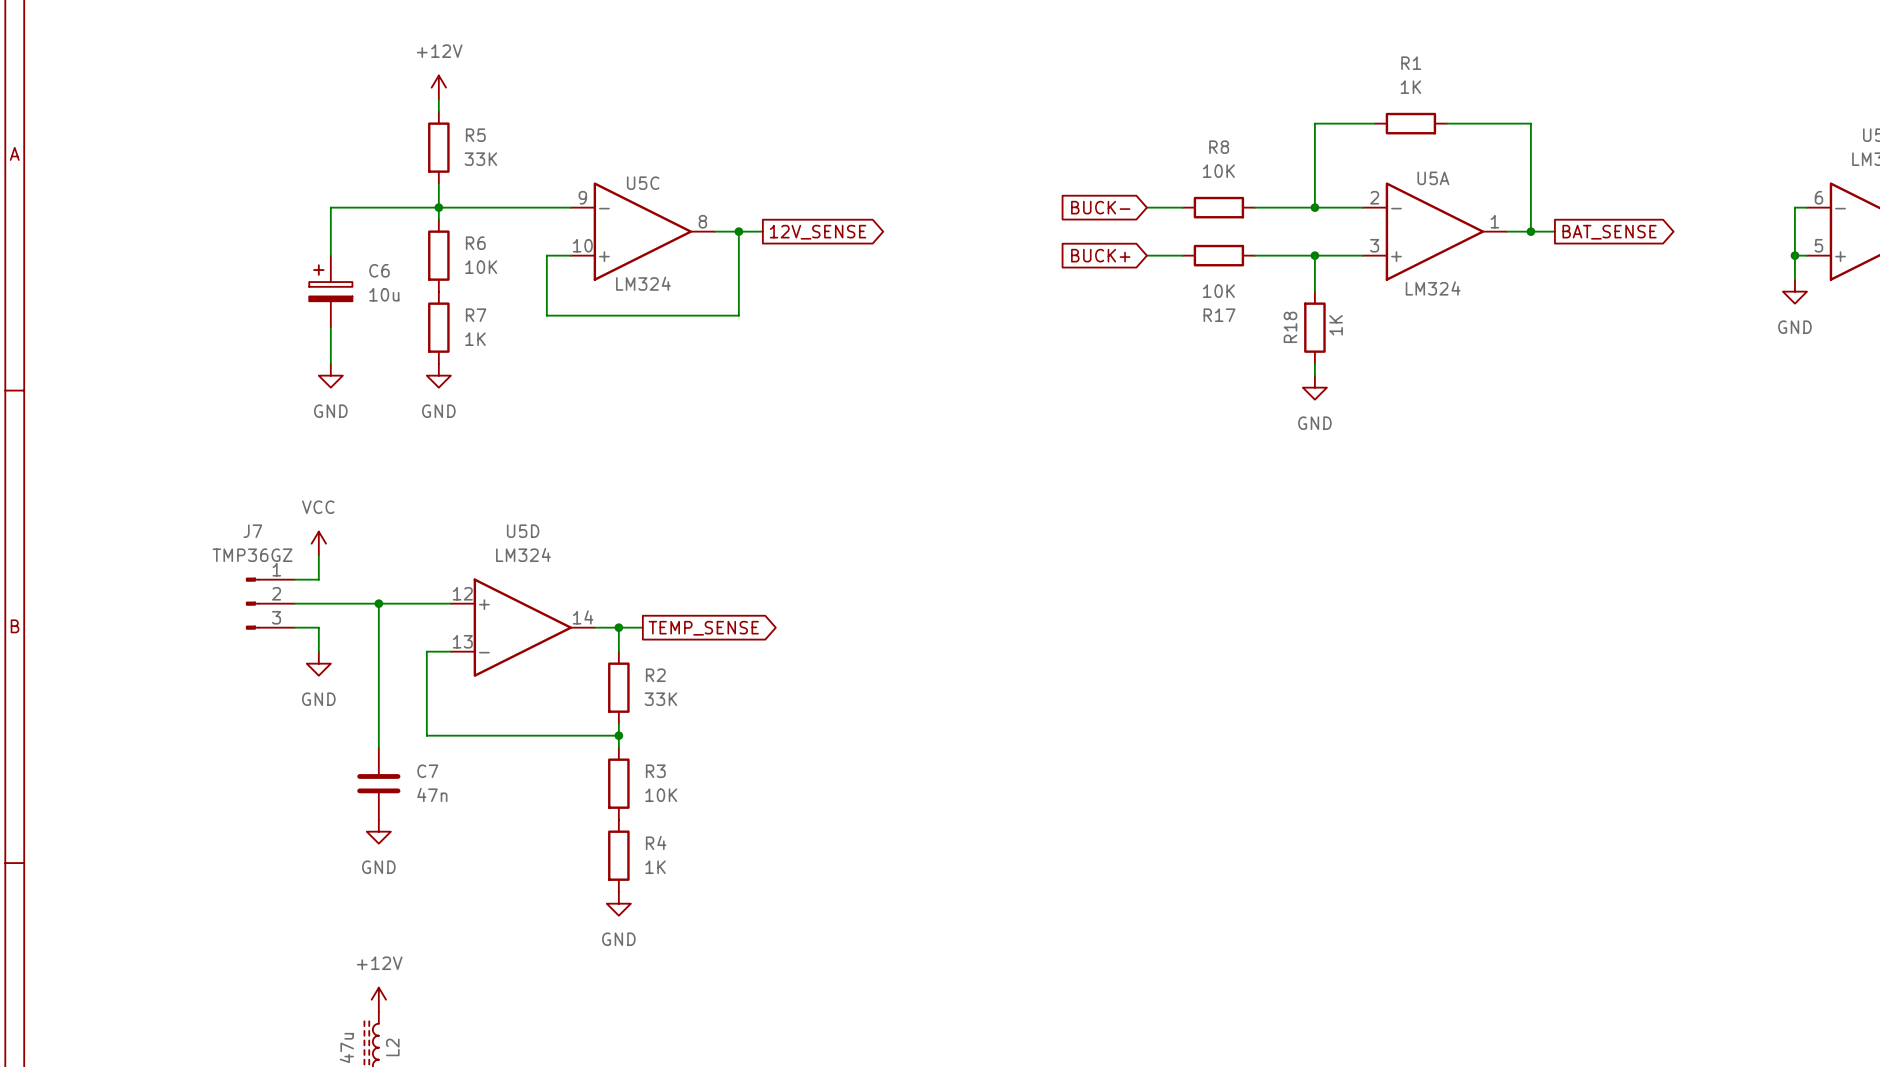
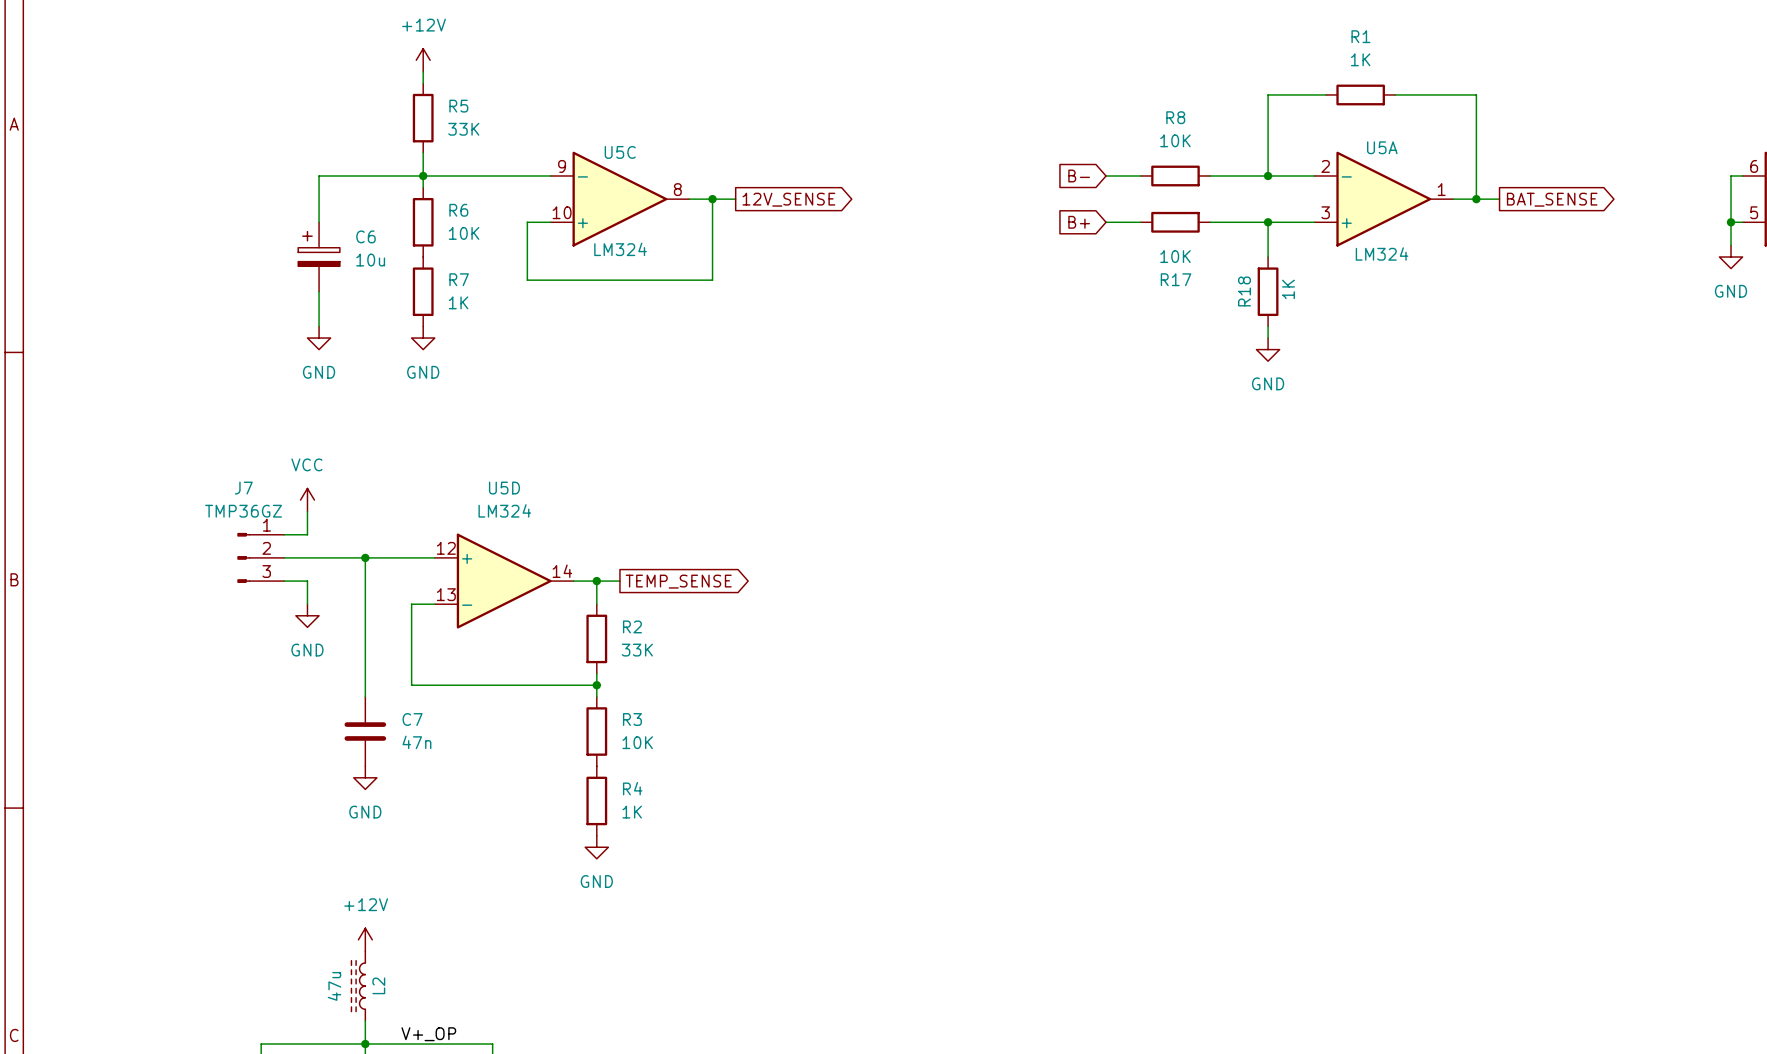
global label: BUCK- (1100, 207) -> B- (1079, 175)
global label: BUCK+ (1100, 255) -> B+ (1079, 222)

